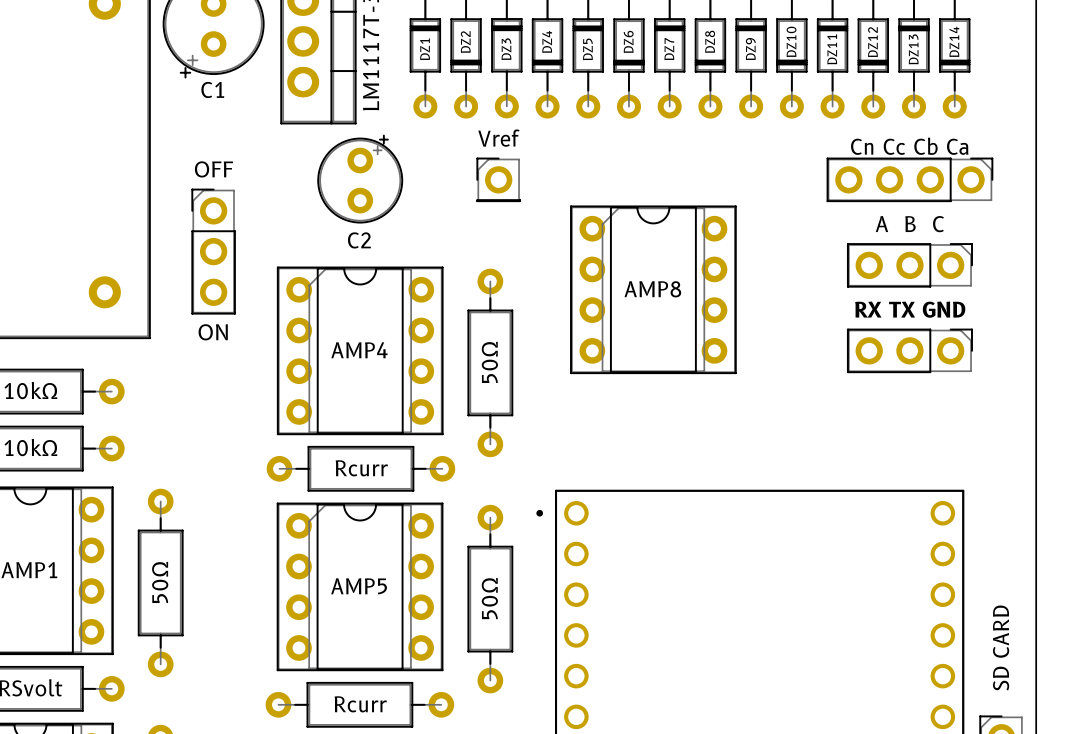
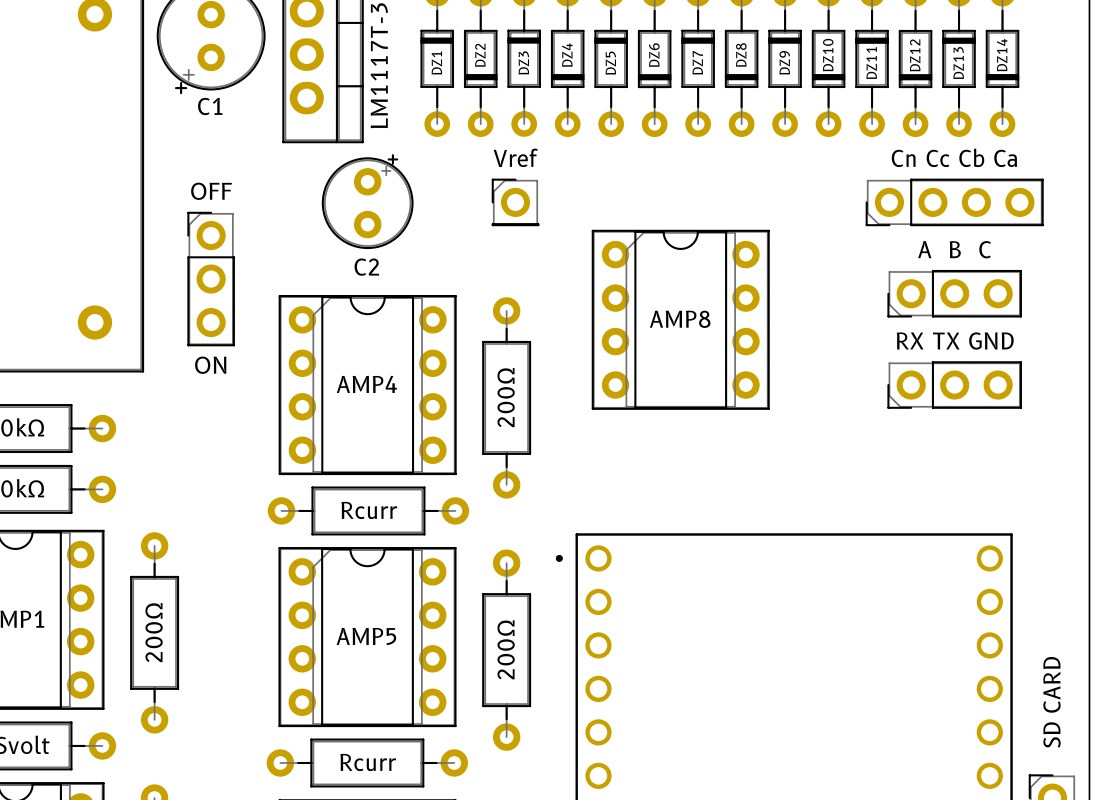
part footprint: [826, 157, 994, 203] -> [865, 178, 1044, 227]
part footprint: [846, 243, 973, 288] -> [887, 269, 1022, 318]
part footprint: [846, 328, 973, 374] -> [887, 361, 1022, 409]
part value: 50Ω (489, 362) -> 200Ω (506, 397)
part value: 50Ω (160, 582) -> 200Ω (154, 632)
part value: 50Ω (489, 598) -> 200Ω (506, 649)

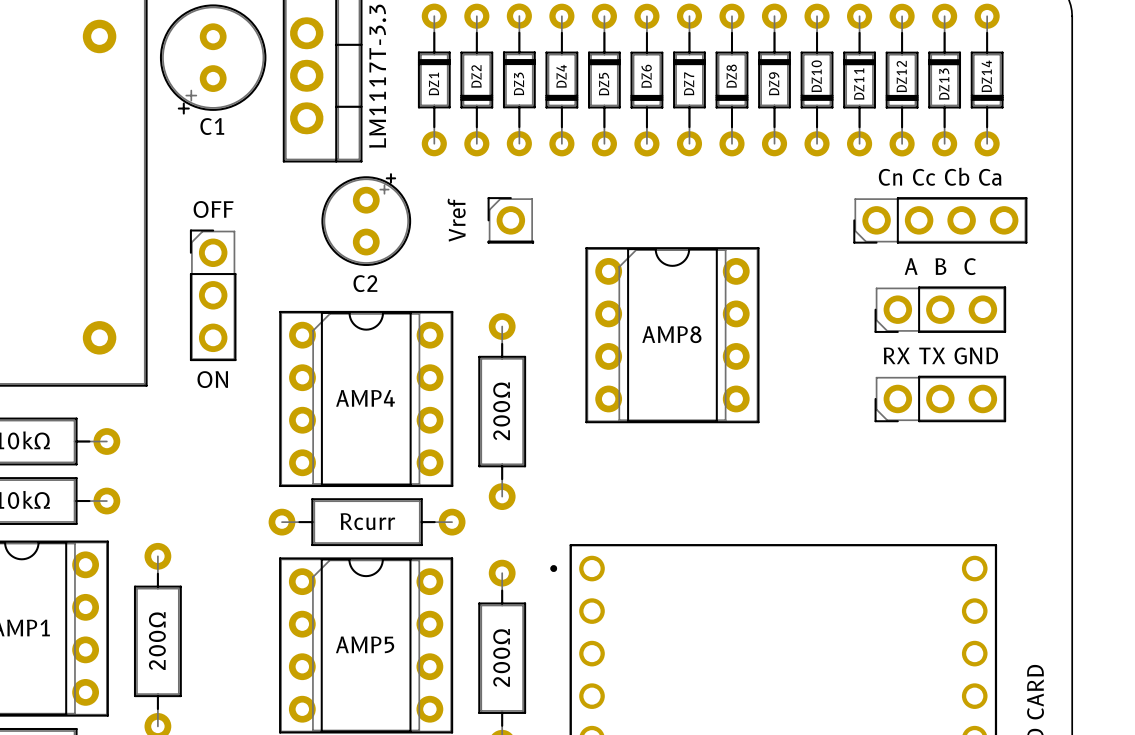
part text rotation: 0° (515, 157) -> 90° counterclockwise (456, 220)

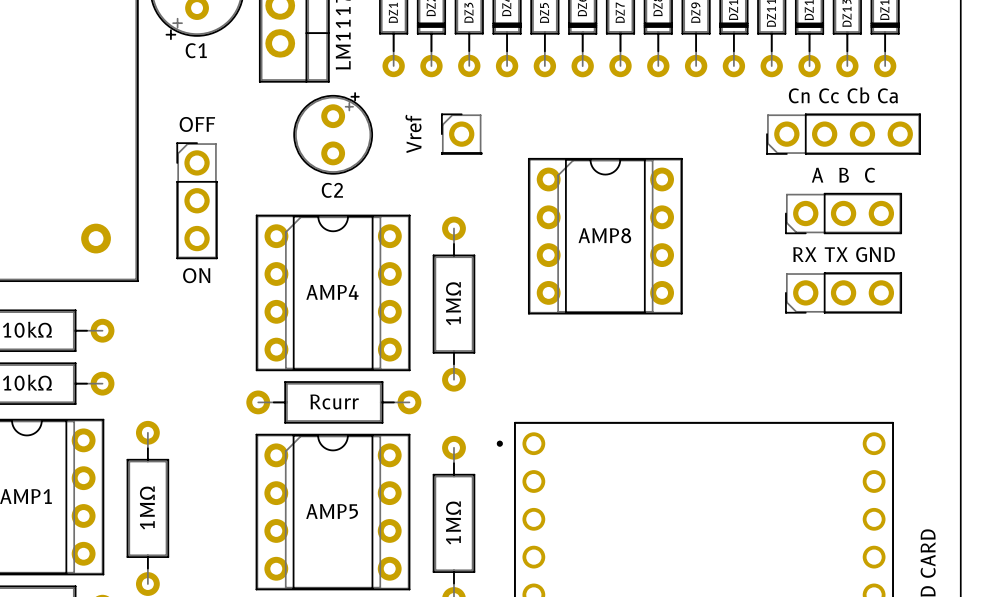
part value: 200Ω (501, 411) -> 1MΩ (453, 303)
part value: 200Ω (157, 641) -> 1MΩ (147, 507)
part value: 200Ω (501, 657) -> 1MΩ (453, 522)

